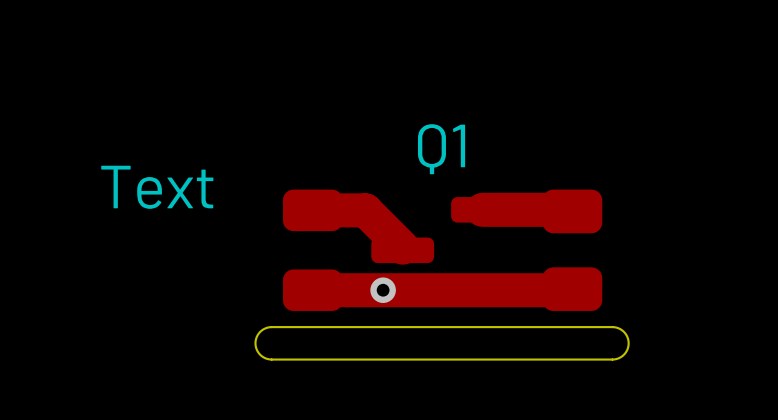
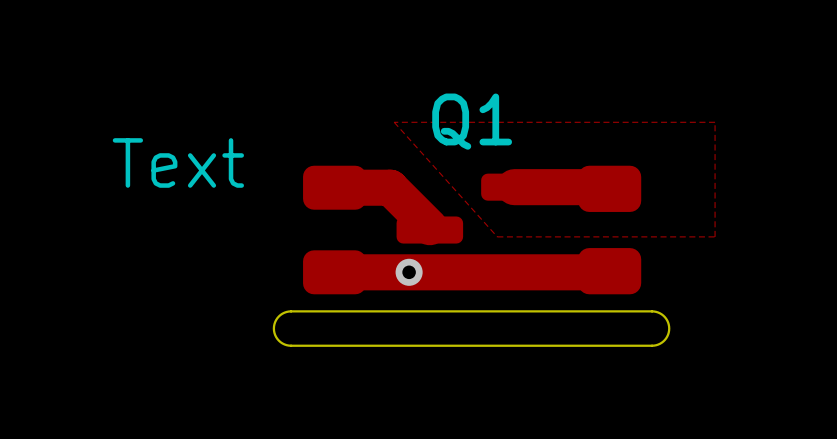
top zone outline: none -> (715, 122) (394, 122) (497, 236) (715, 236) (715, 122)

